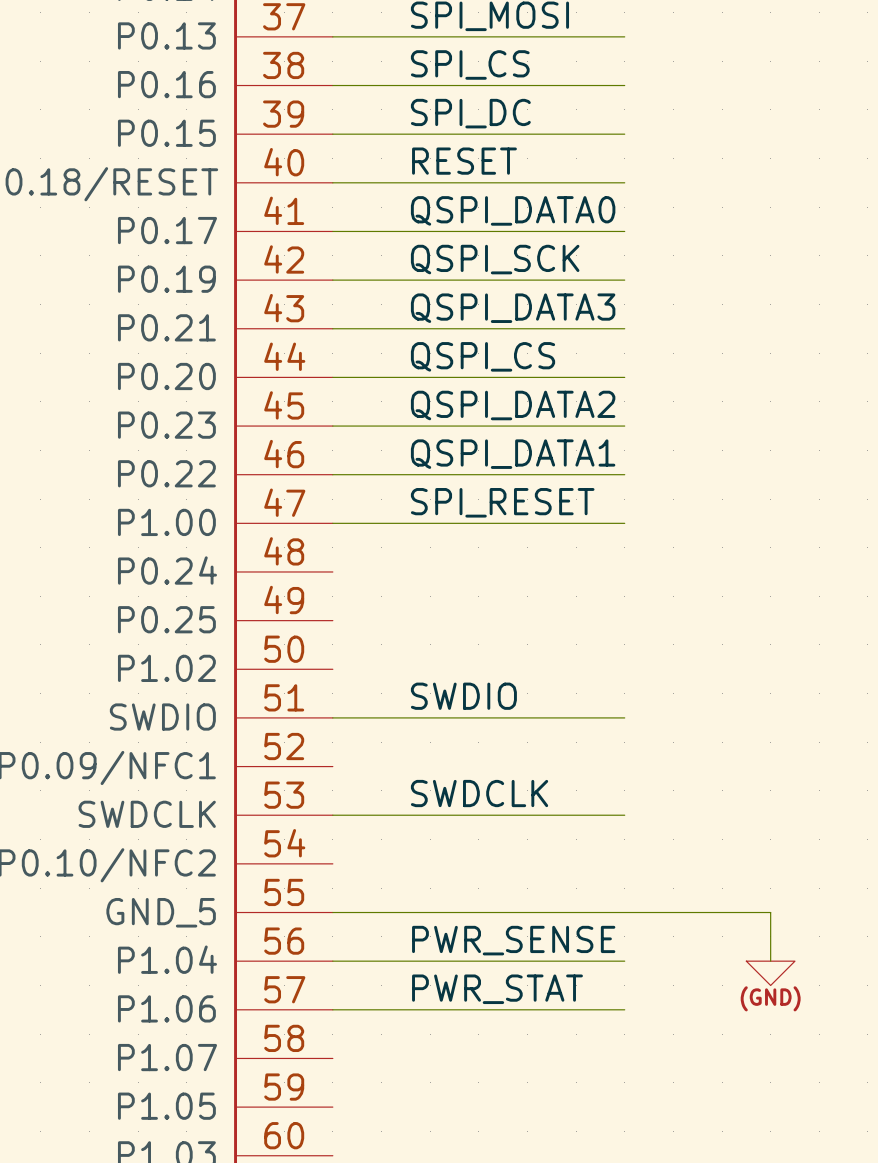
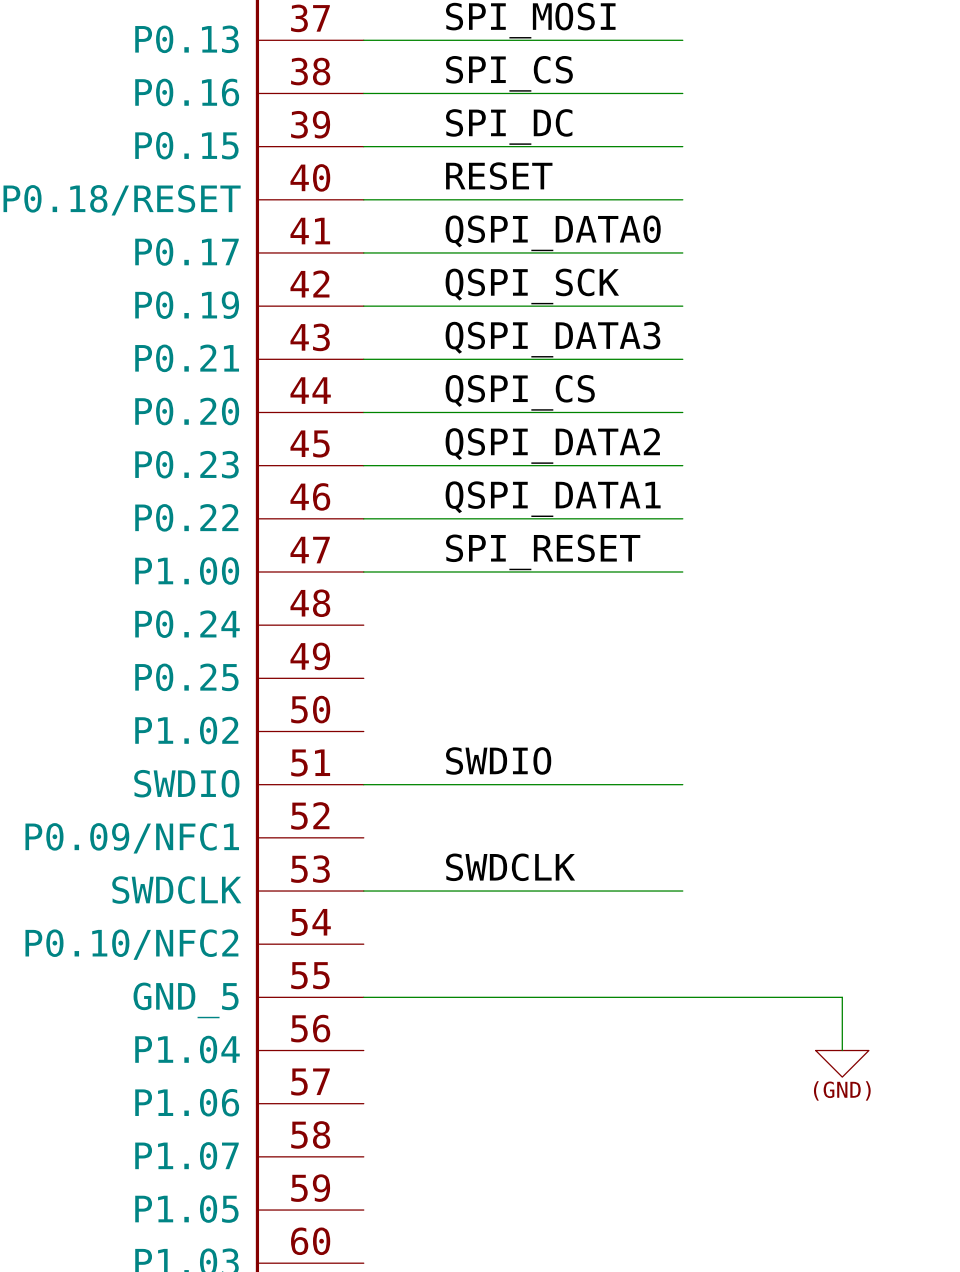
label: PWR_SENSE (513, 940) -> none
wire: (332, 961) (624, 961) -> none
label: PWR_STAT (497, 989) -> none
wire: (332, 1009) (624, 1009) -> none

